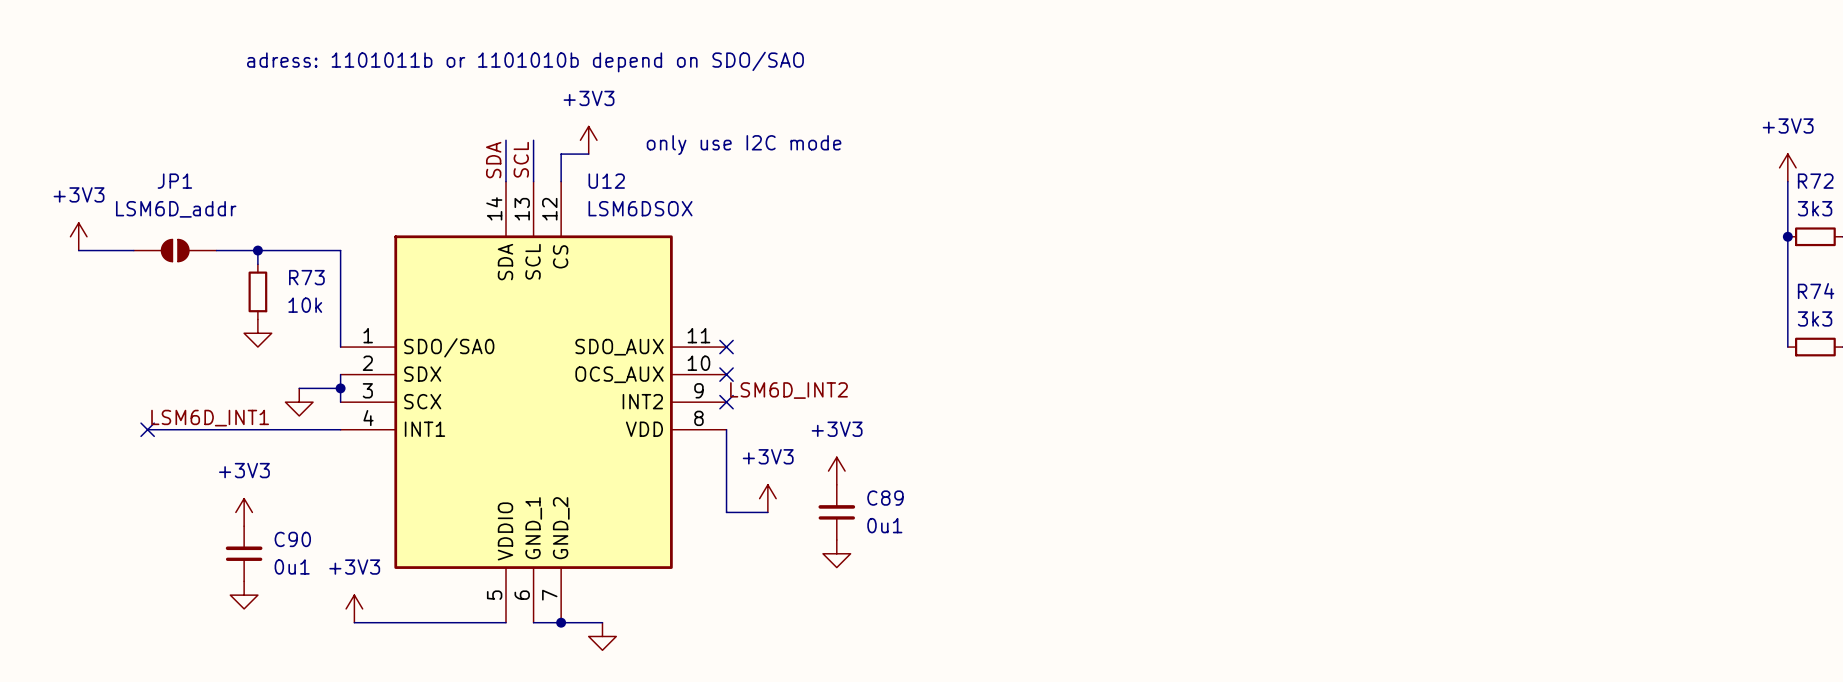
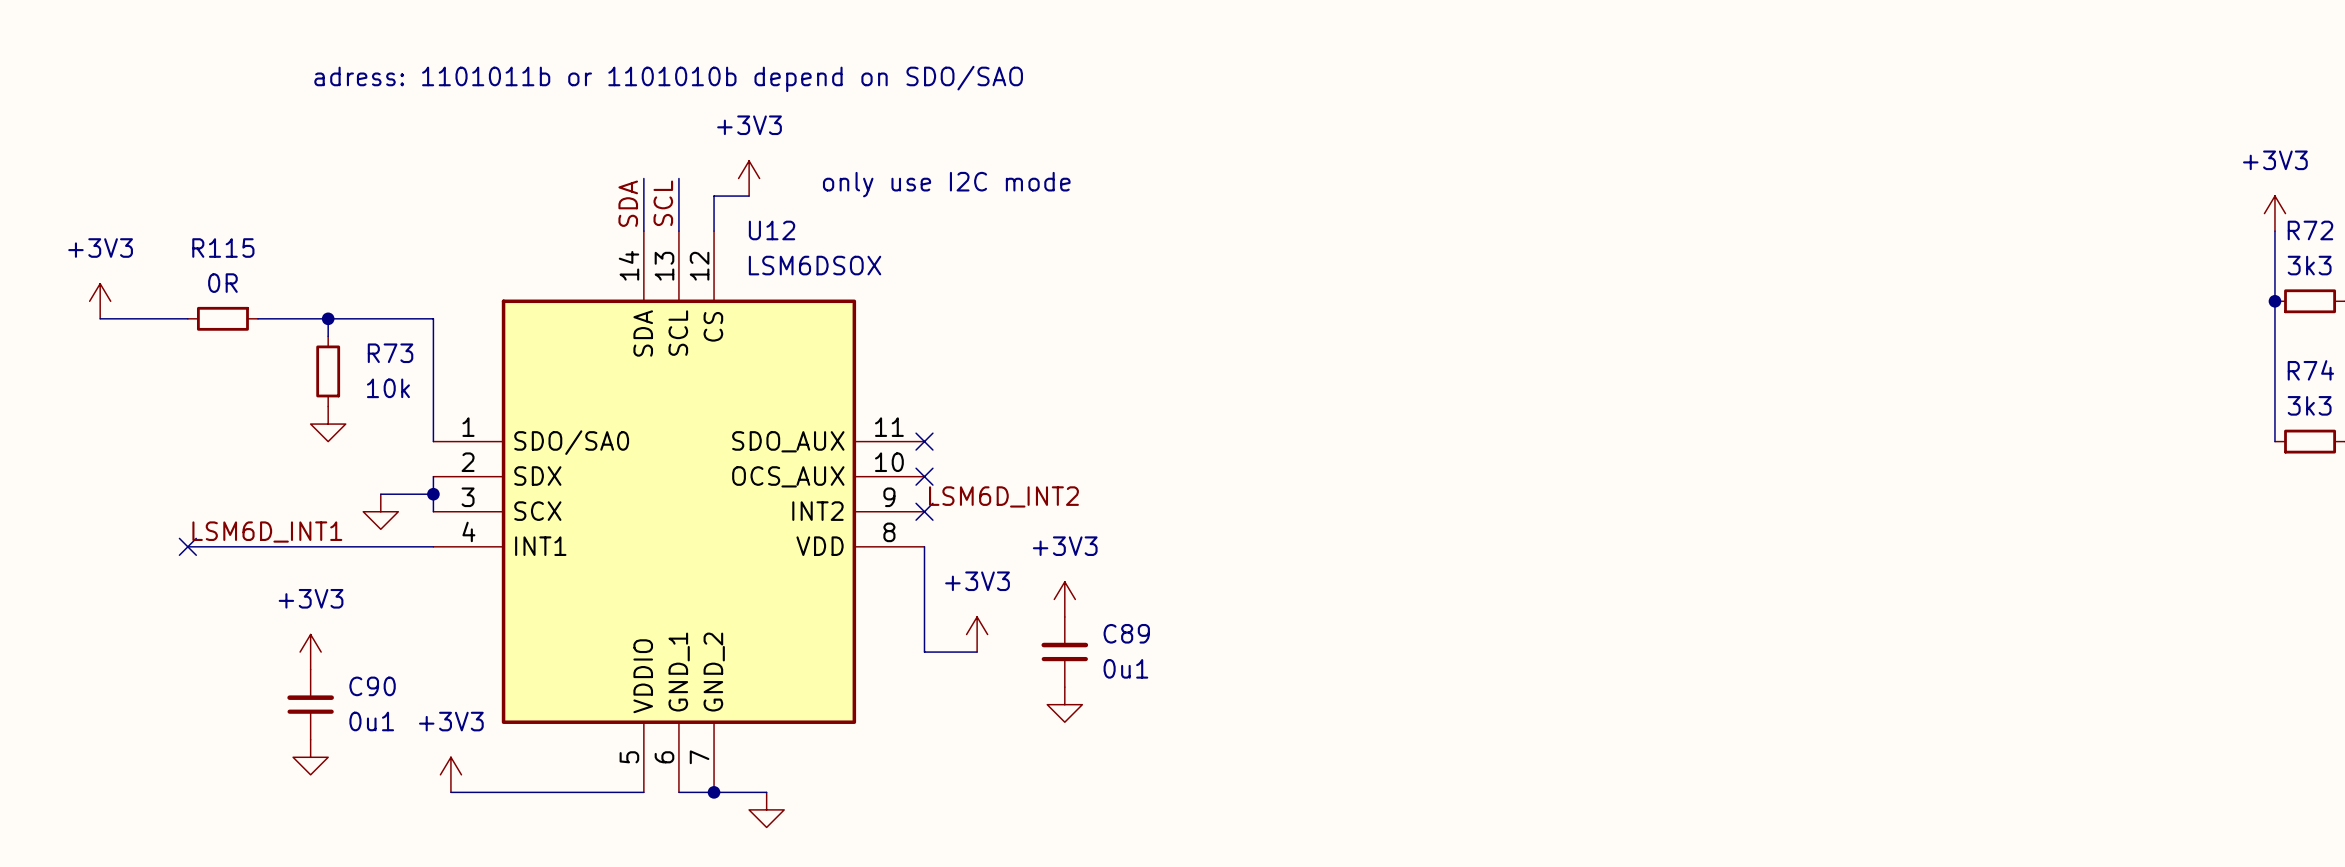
JP1: LSM6D_addr (175, 250) -> none
R115: none -> 0R (222, 318)

